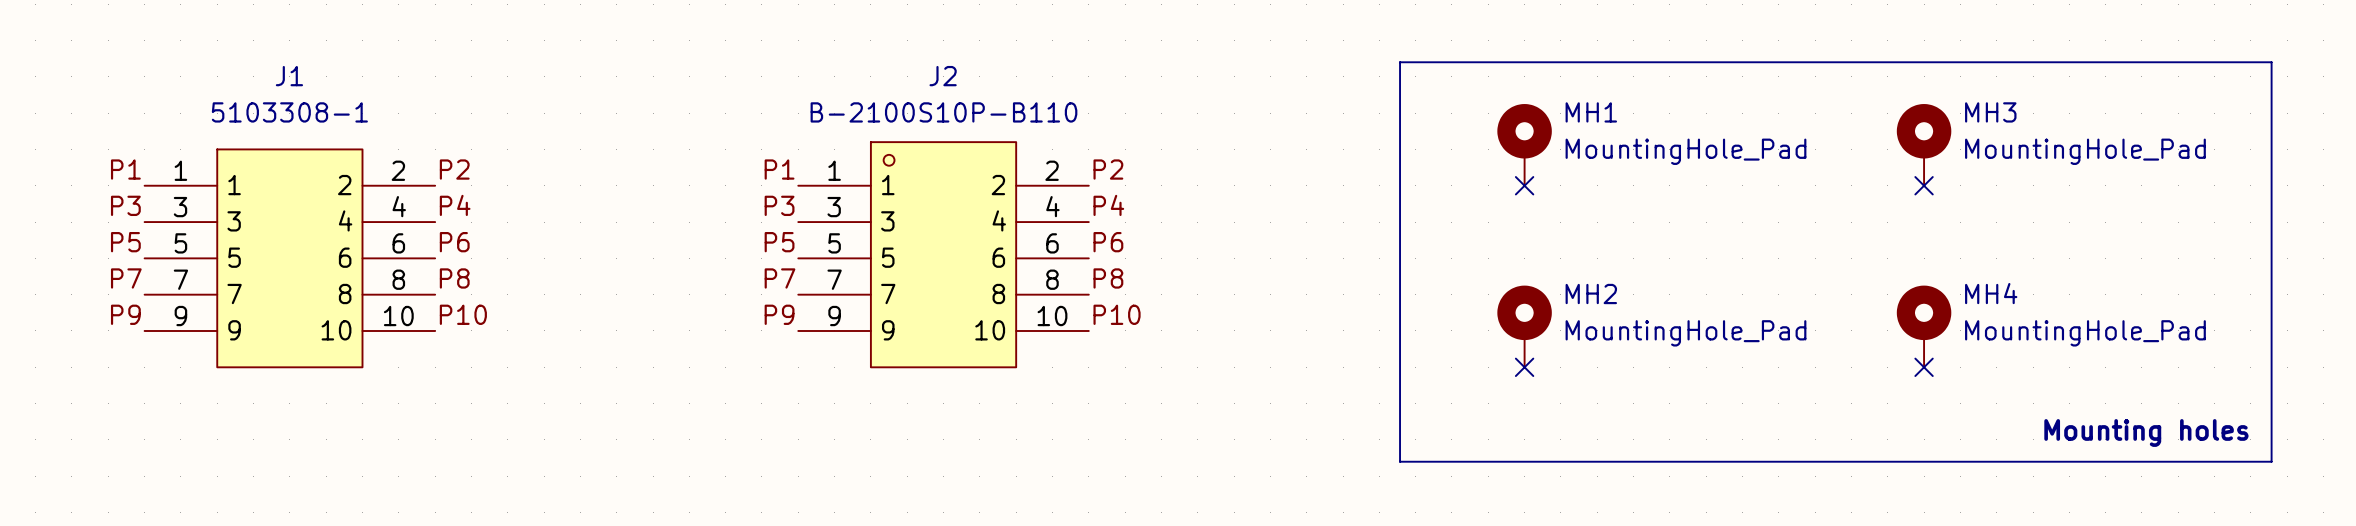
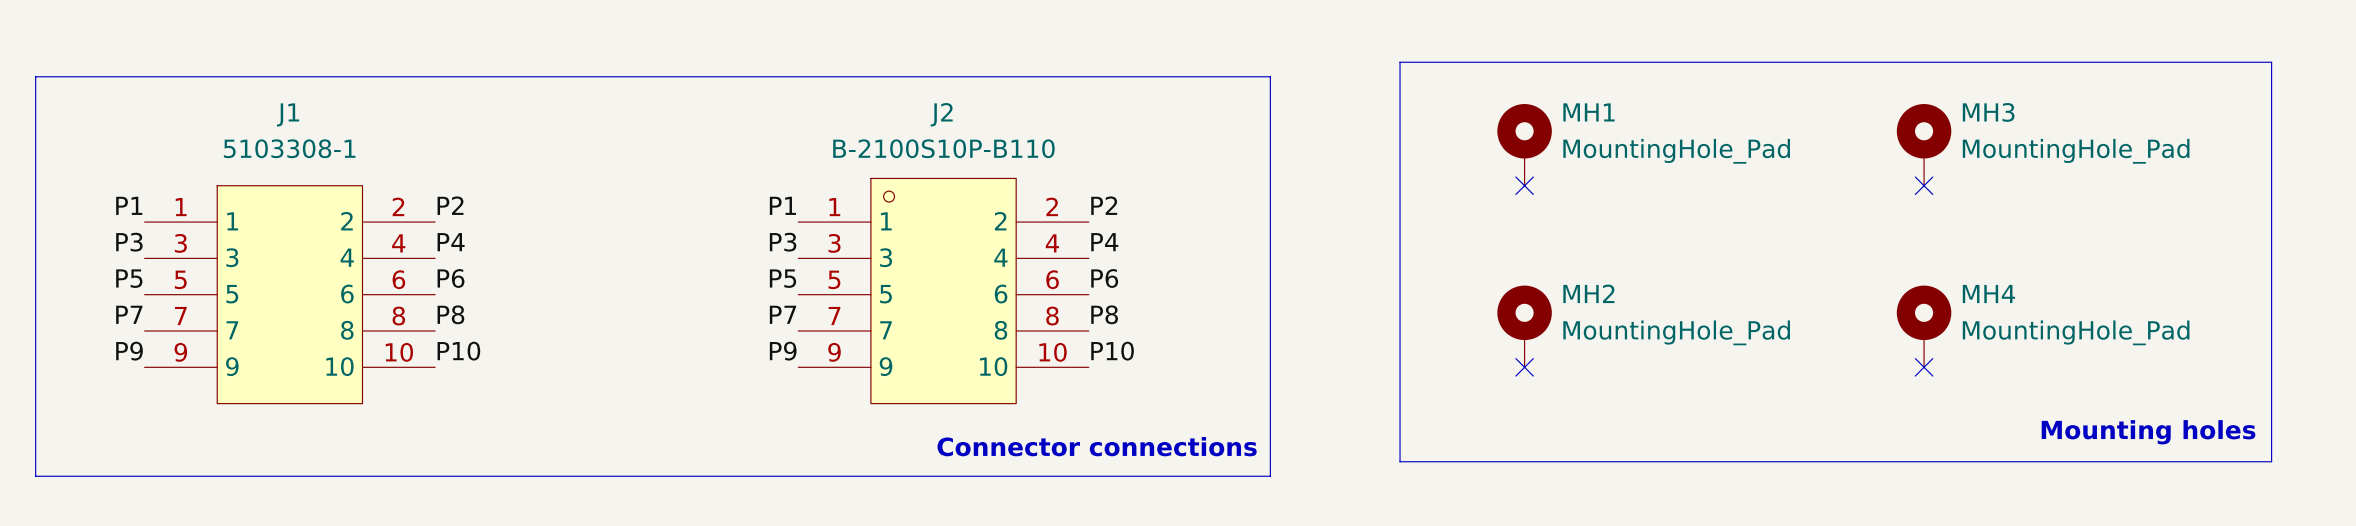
line: none -> (35, 76) (1270, 76) (1270, 476) (35, 476) (35, 76)
label: P1 (125, 169) -> none
label: P2 (454, 169) -> none
label: P1 (779, 169) -> none
label: P2 (1108, 169) -> none
label: P3 (125, 205) -> P1 (129, 205)
label: P4 (455, 205) -> P2 (450, 205)
label: P3 (779, 205) -> P1 (782, 205)
label: P4 (1108, 205) -> P2 (1104, 205)
label: P5 (125, 242) -> P3 (129, 242)
label: P6 (454, 242) -> P4 (451, 242)
label: P5 (779, 242) -> P3 (783, 242)
label: P6 (1108, 242) -> P4 (1104, 242)
J2 position: (943, 254) -> (943, 291)
J1 position: (289, 258) -> (289, 294)
label: P7 (126, 278) -> P5 (129, 278)
label: P8 (454, 278) -> P6 (450, 278)
label: P7 (779, 278) -> P5 (782, 278)
label: P8 (1108, 278) -> P6 (1104, 278)
label: P9 (125, 314) -> P7 (129, 314)
label: P10 (463, 314) -> P8 (450, 314)
label: P9 (779, 314) -> P7 (783, 314)
label: P10 (1117, 314) -> P8 (1104, 314)
label: none -> P9 (129, 351)
label: none -> P10 (458, 351)
label: none -> P9 (783, 351)
label: none -> P10 (1112, 351)
text: none -> Connector connections (1097, 446)

